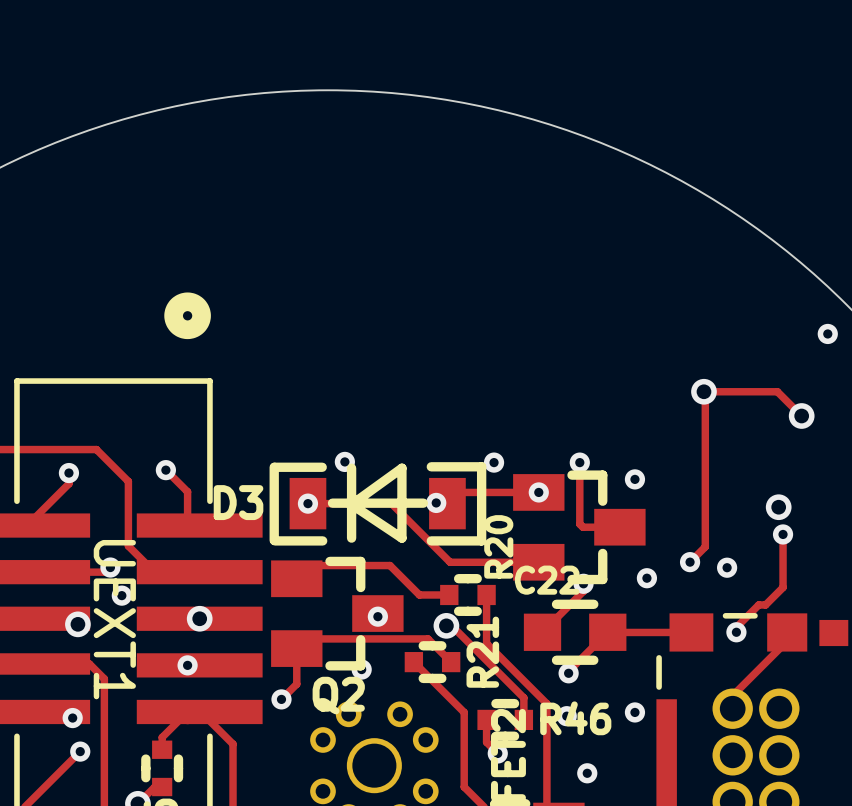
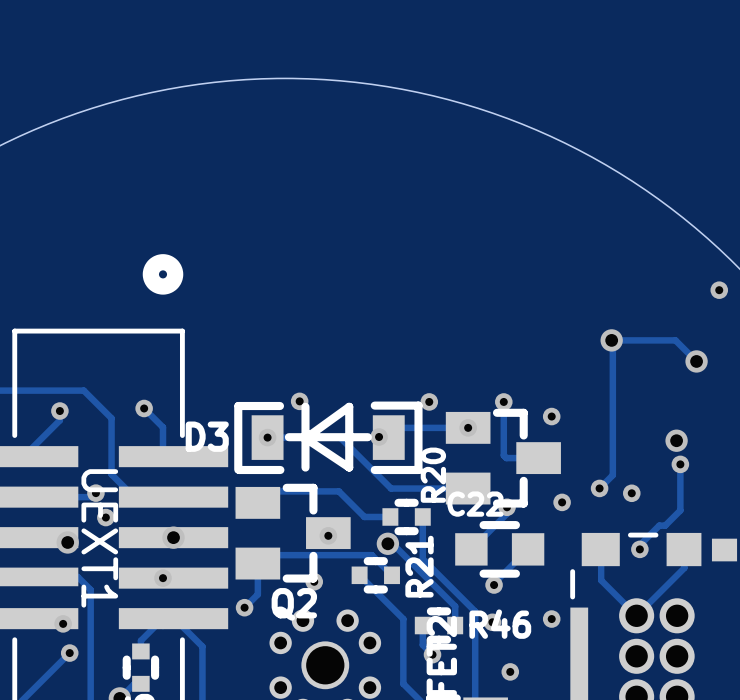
track: (607, 632) (691, 632) -> none
track: (787, 632) (787, 641) (732, 695) -> none
track: none -> (601, 554) (601, 580) (636, 615) (684, 568) (684, 554)

